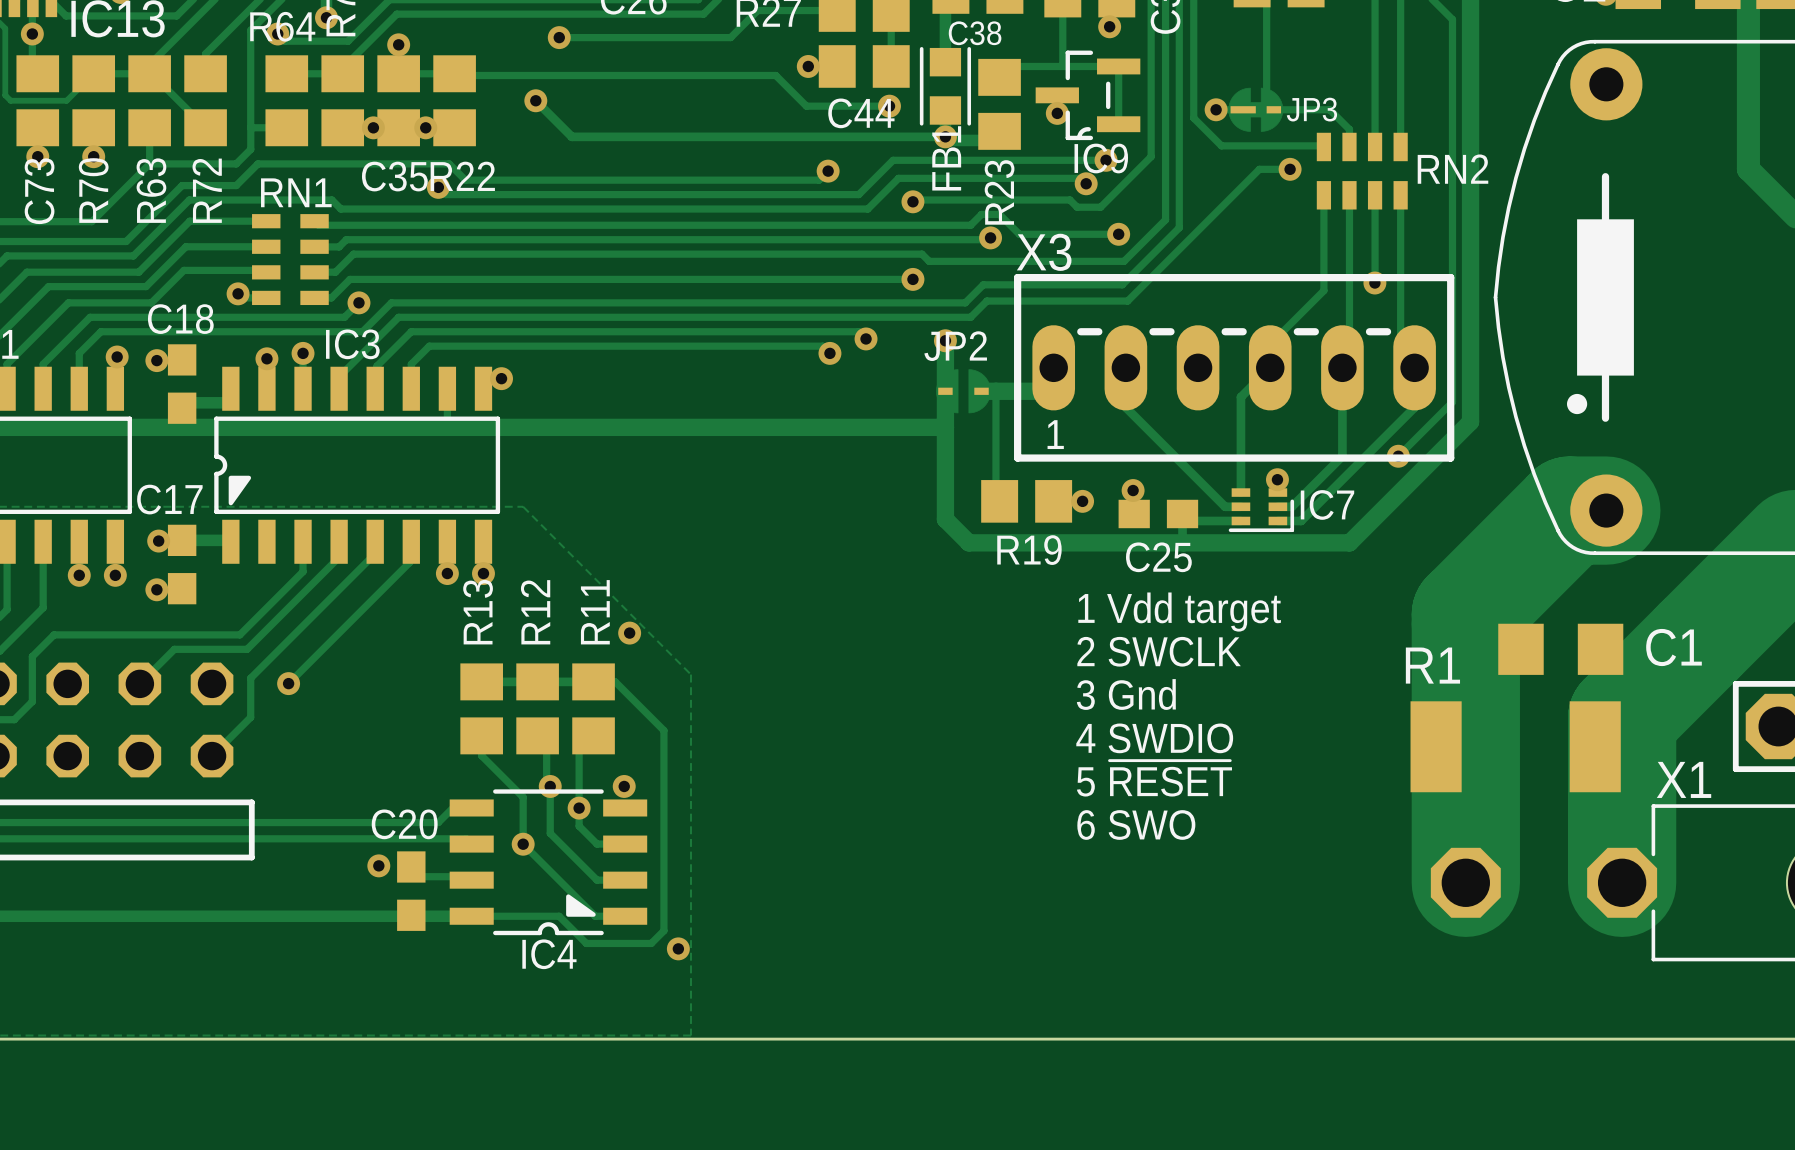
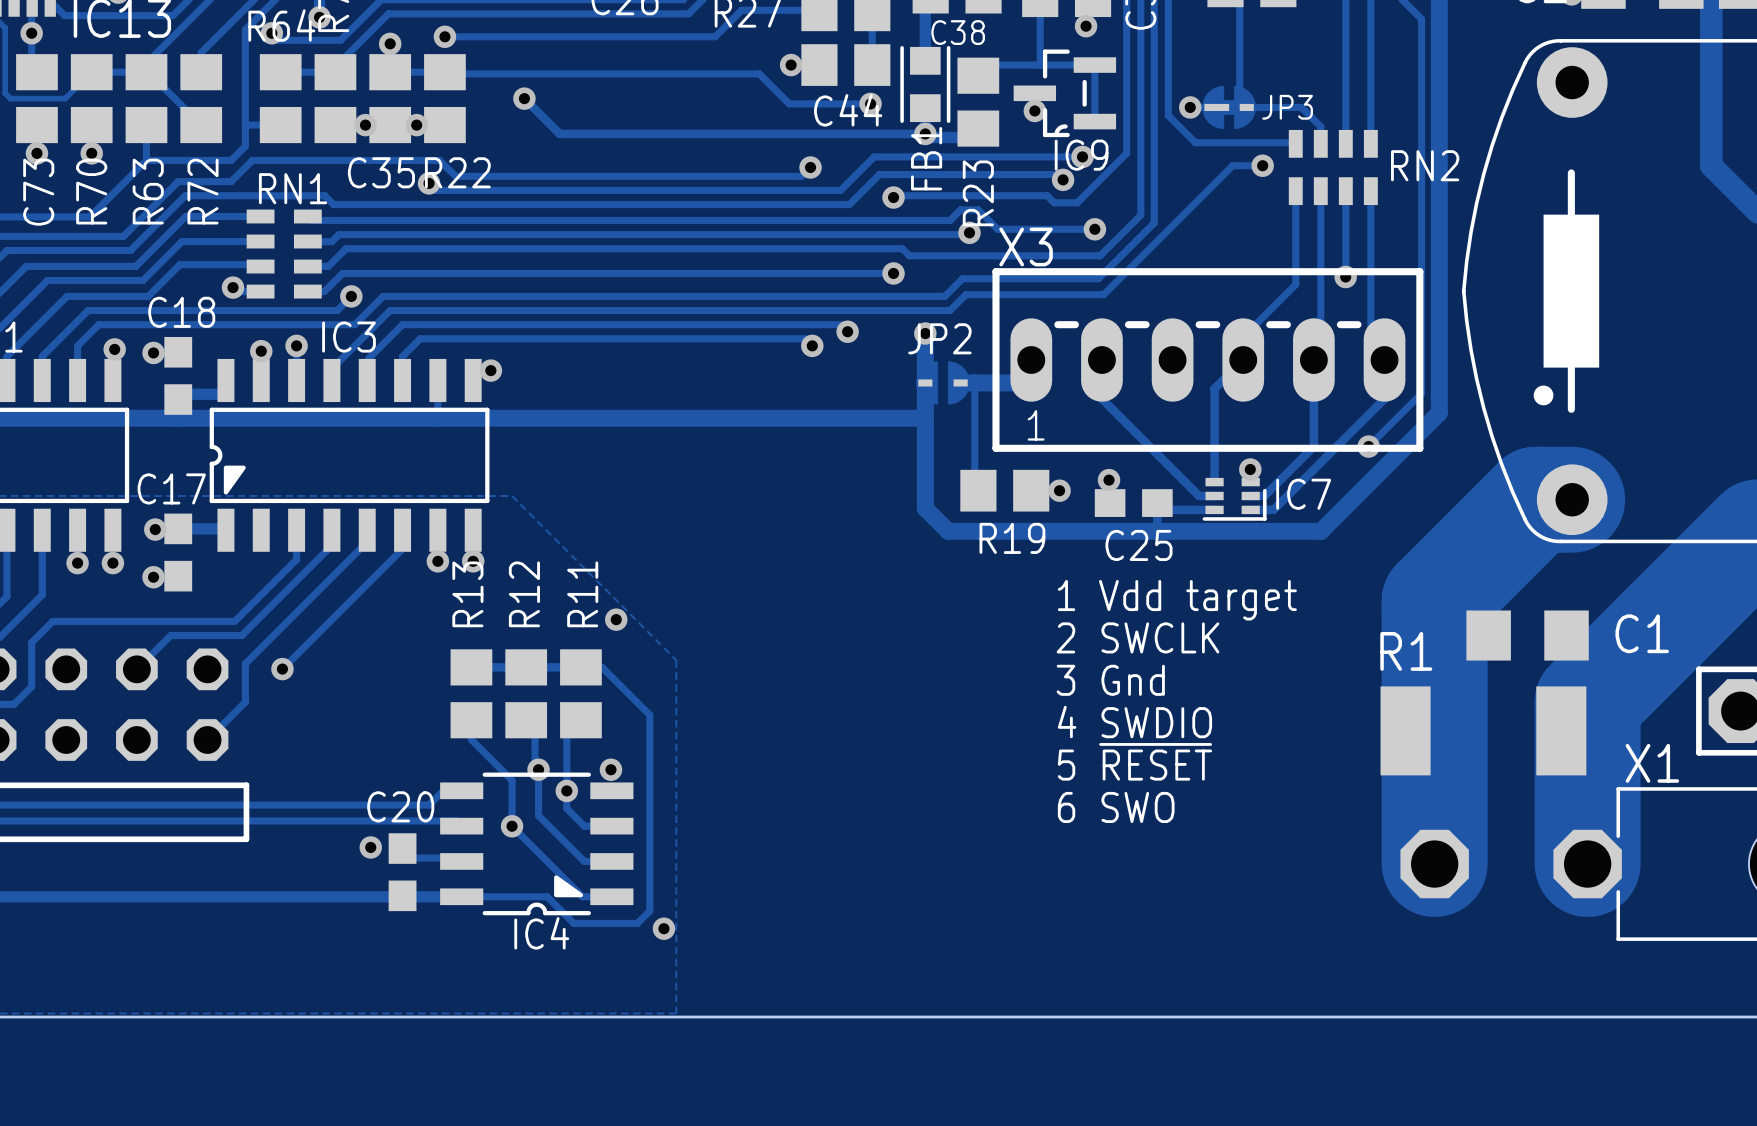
track: none -> (444, 36) (547, 36)
via position: (559, 37) -> (444, 36)

